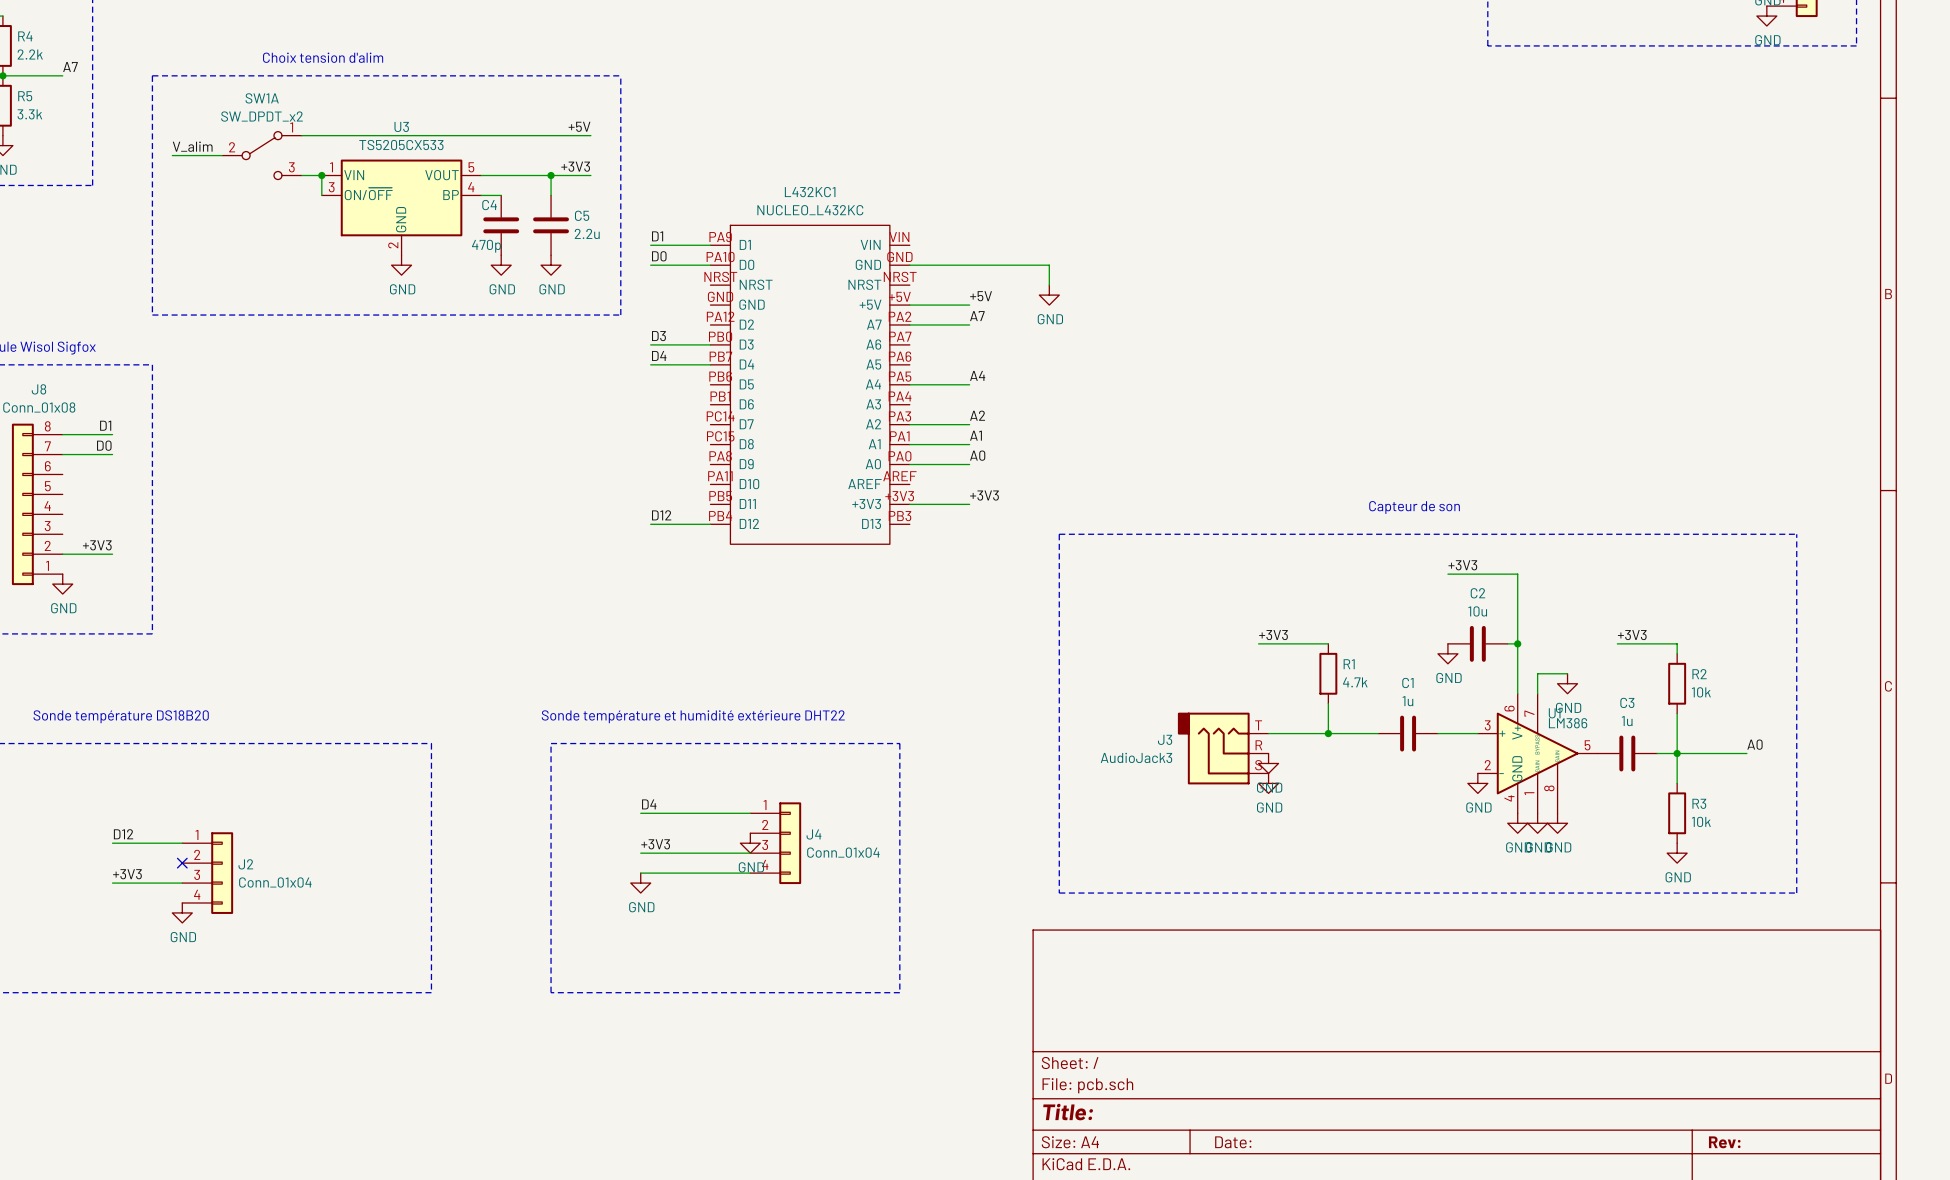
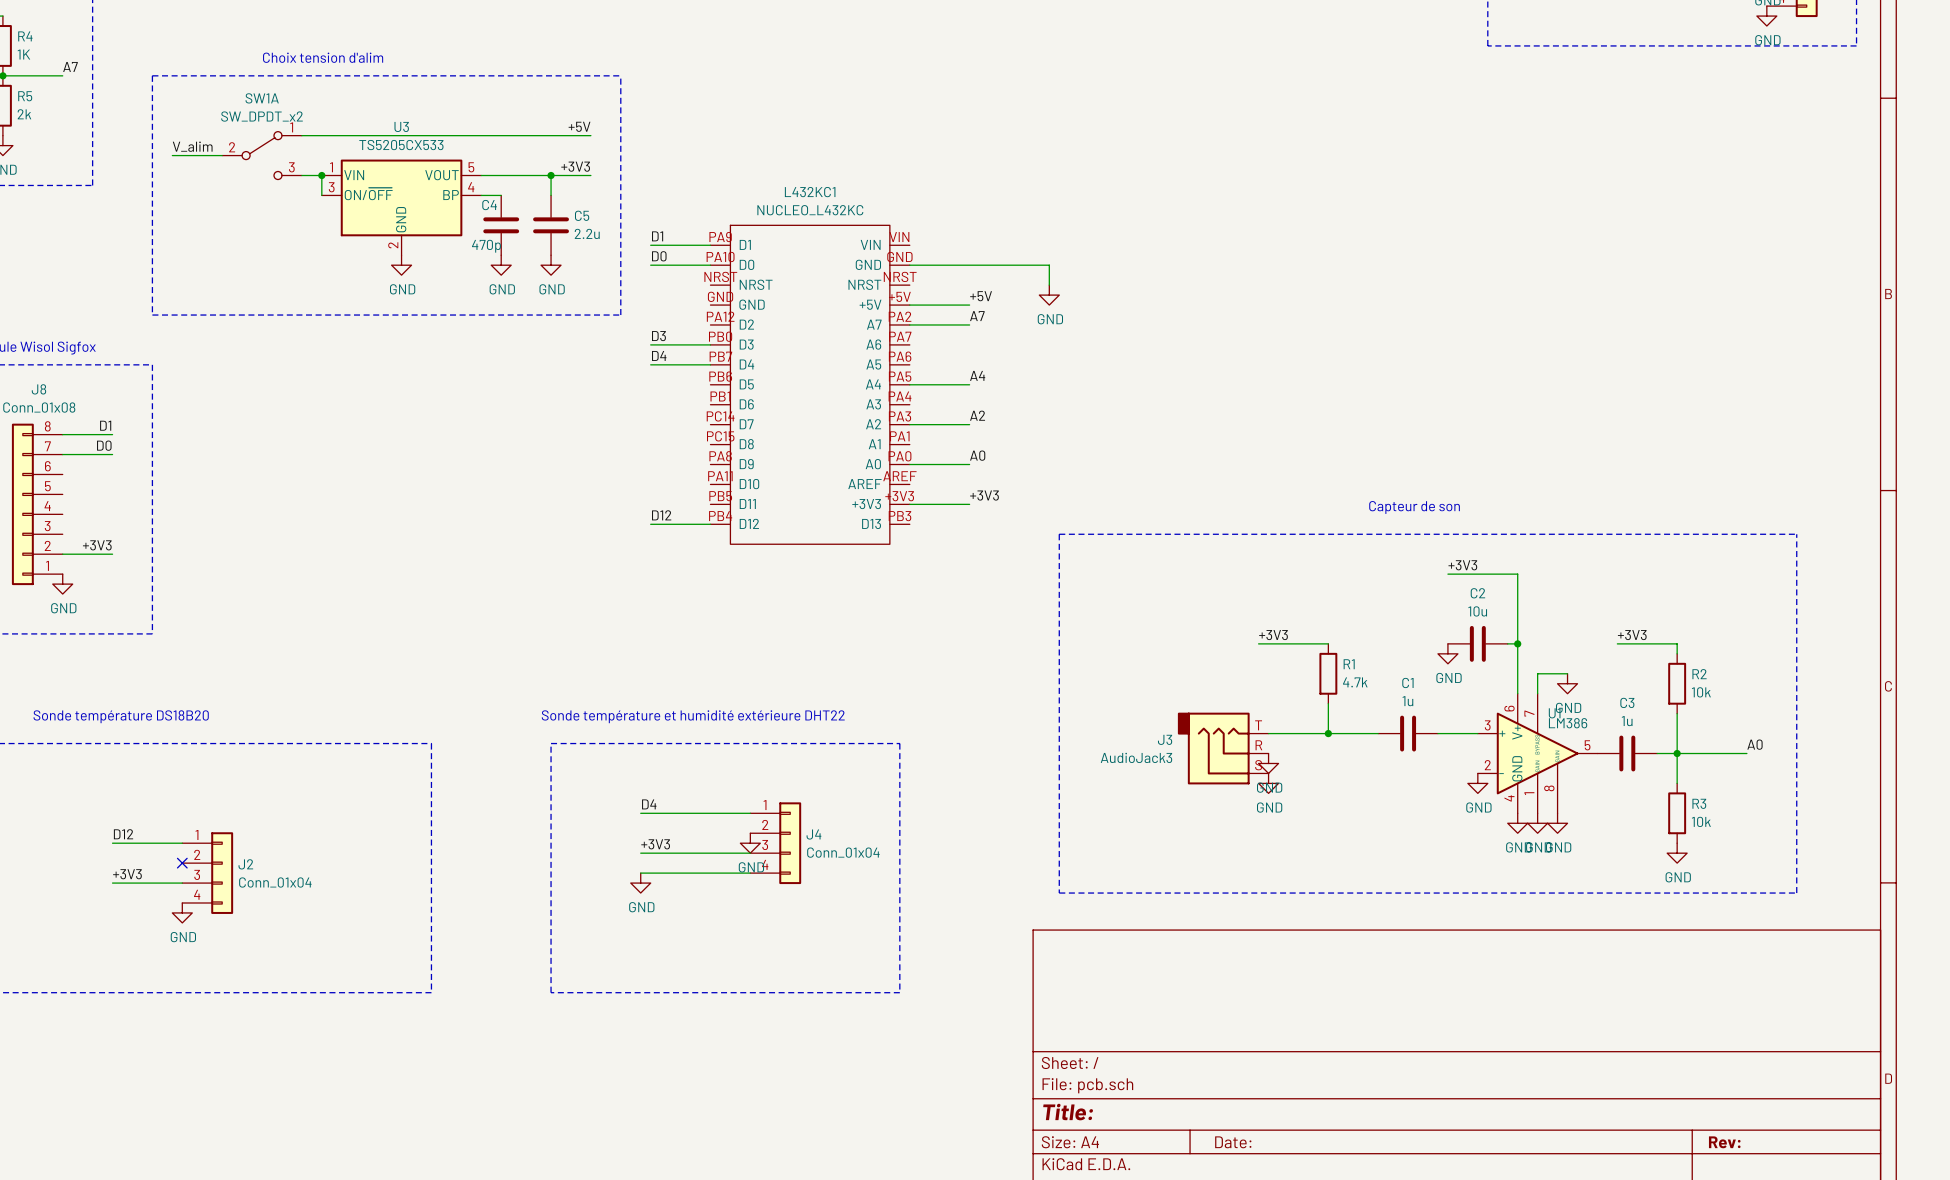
R4 value: 2.2k (30, 54) -> 1K (23, 54)
R5 value: 3.3k (29, 114) -> 2k (24, 114)
label: A1 (975, 435) -> none
wire: (909, 444) (969, 444) -> none

